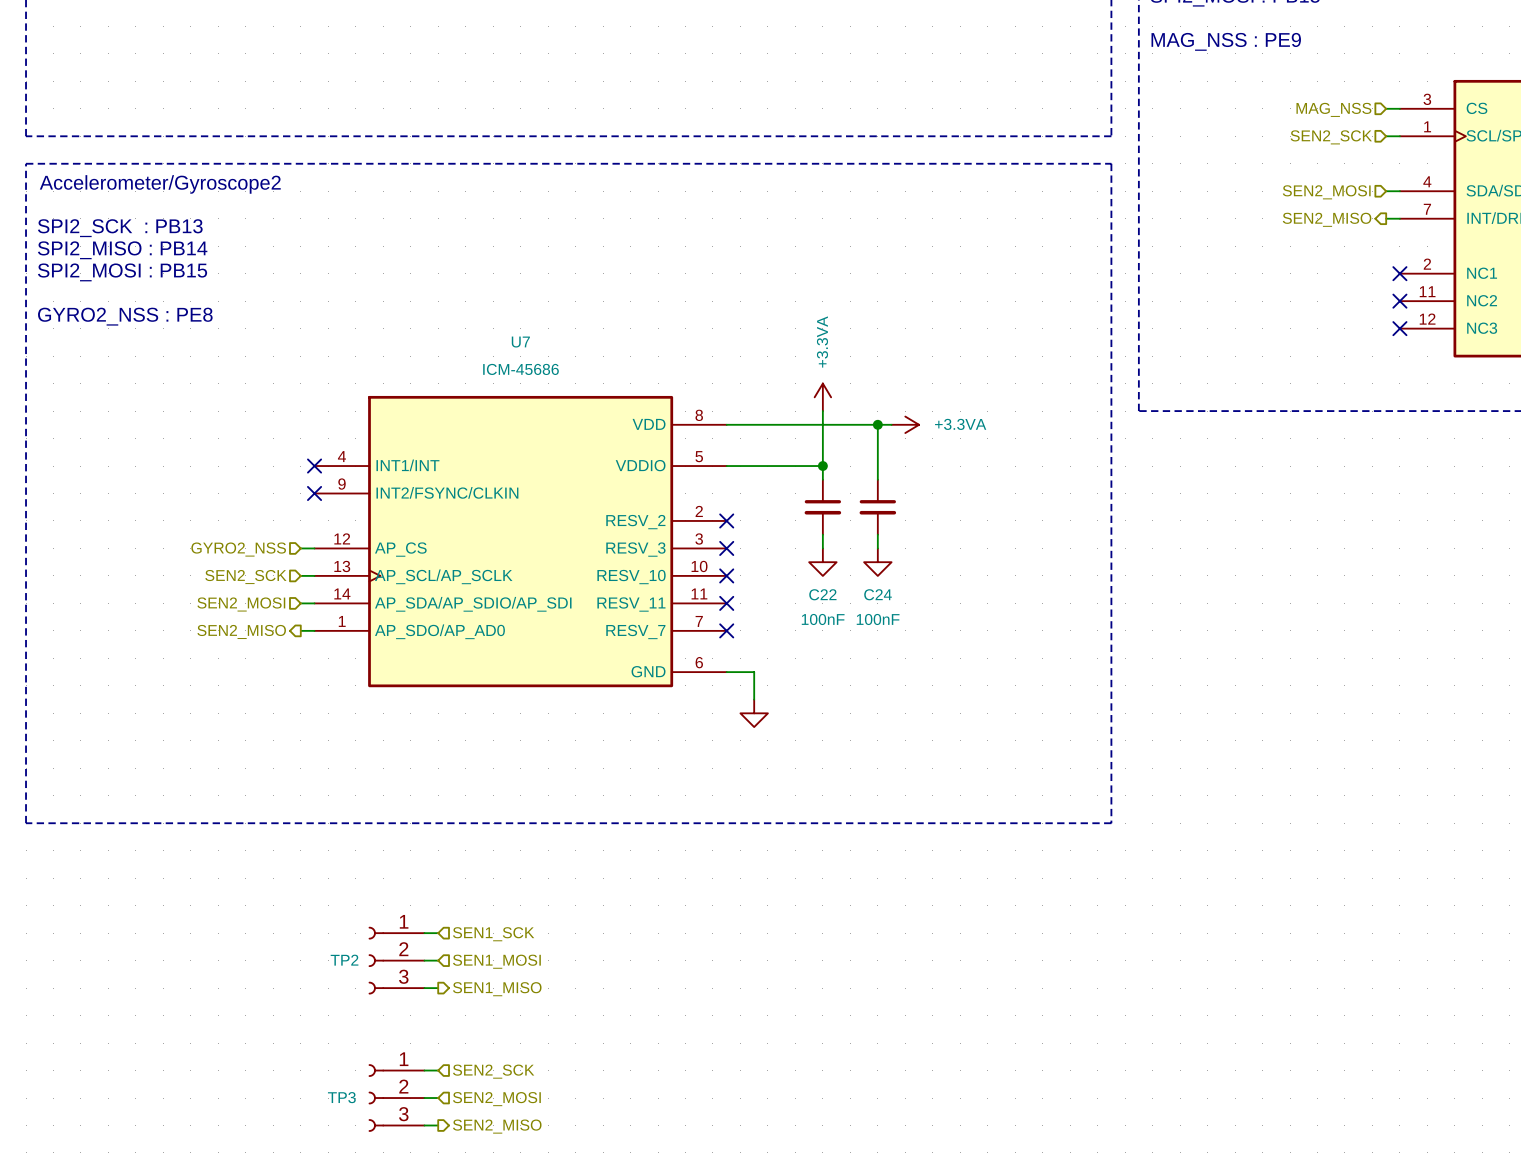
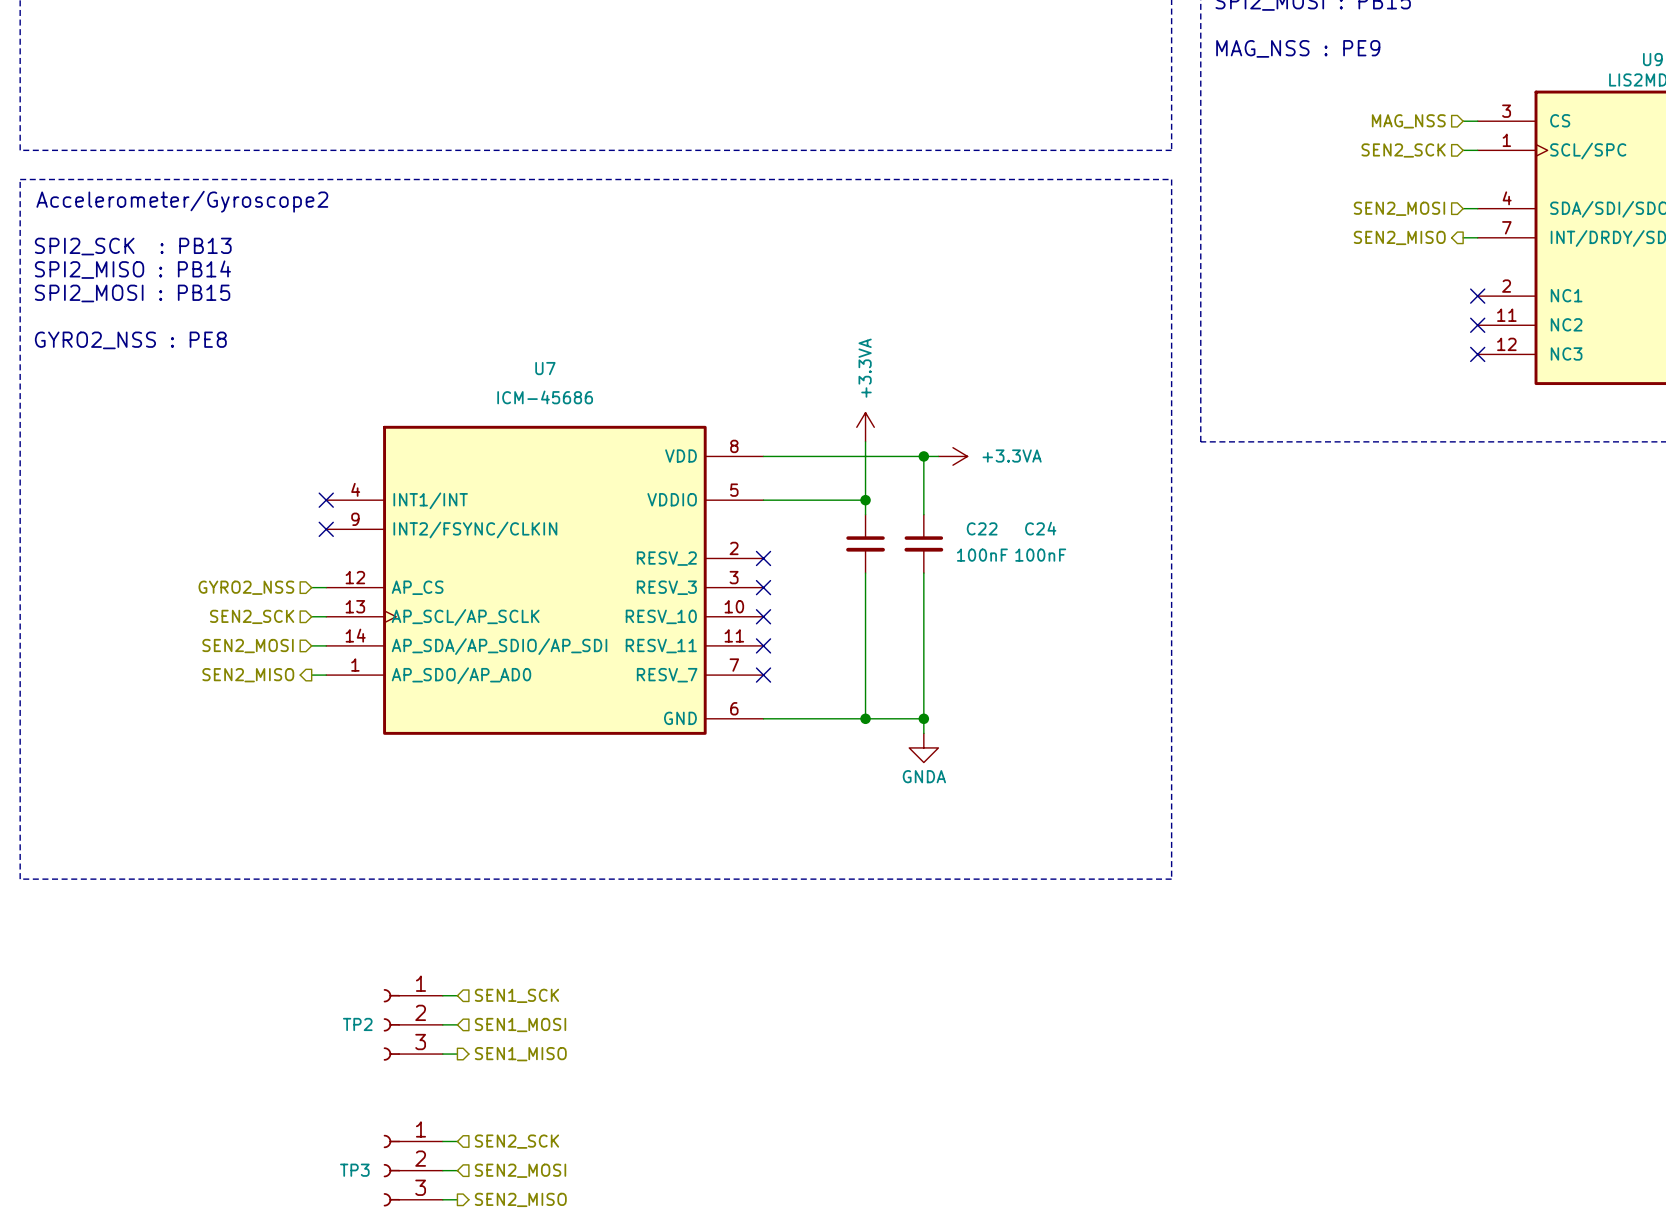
wire: none -> (865, 587) (865, 718)
wire: none -> (923, 587) (923, 733)
power symbol: (822, 562) -> none
power symbol: (877, 562) -> none
C22 name position: C22 (822, 594) -> C22 (982, 528)
C24 name position: C24 (878, 594) -> C24 (1040, 528)
C22 value position: 100nF (823, 619) -> 100nF (982, 555)
C24 value position: 100nF (878, 619) -> 100nF (1040, 555)
wire: (754, 672) (754, 699) -> (792, 718) (923, 718)
junction: none -> (865, 718)
junction: none -> (923, 718)
power symbol: none -> GNDA (923, 747)
power symbol: (754, 713) -> none

